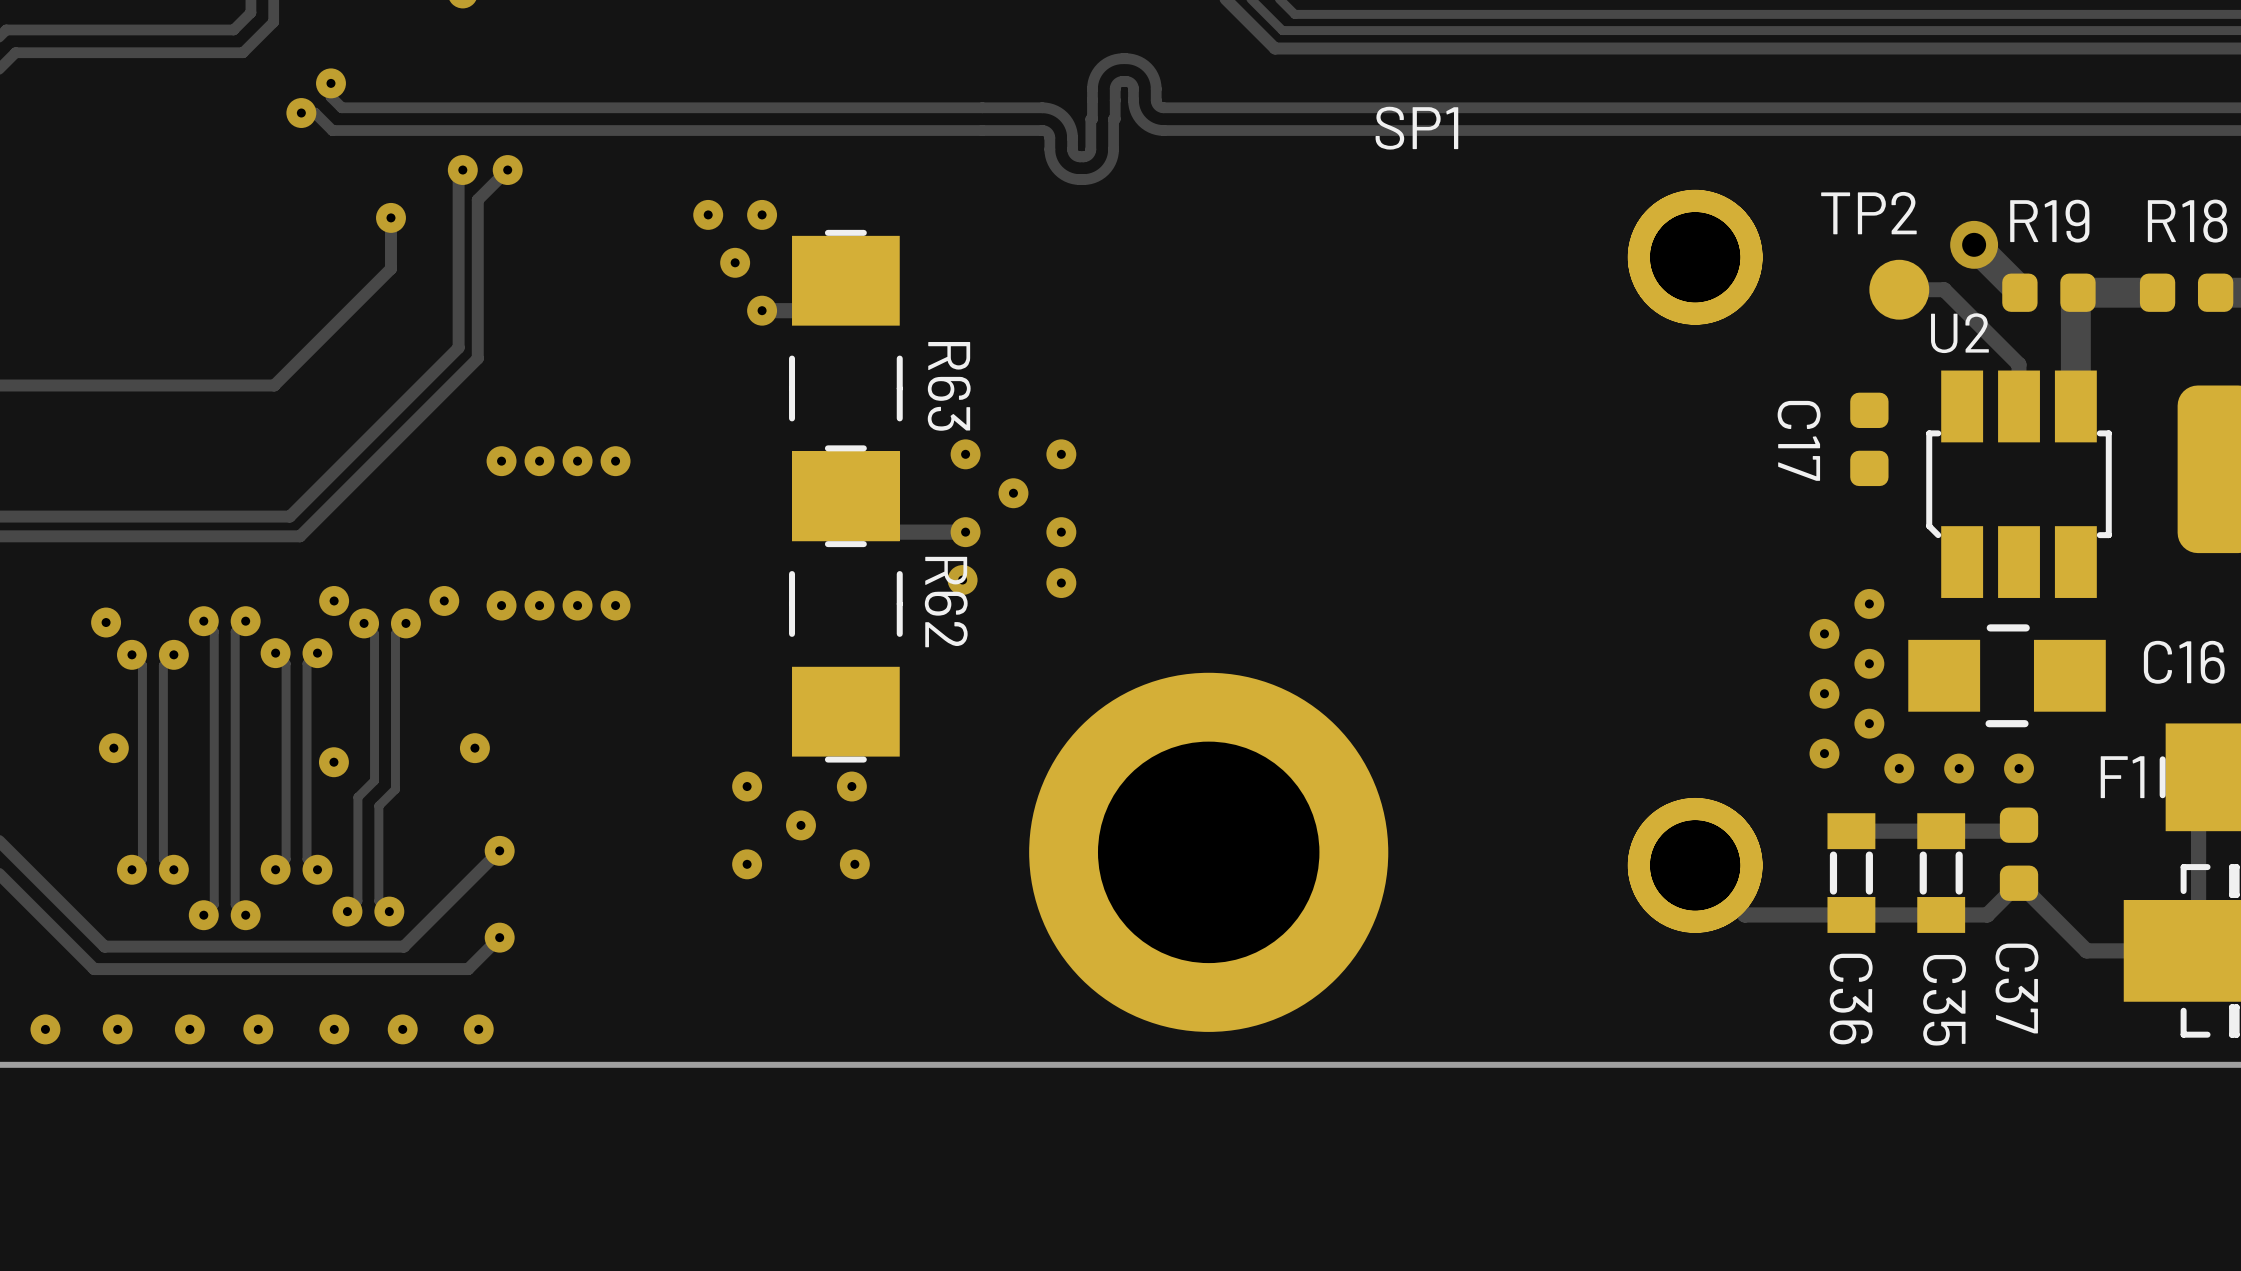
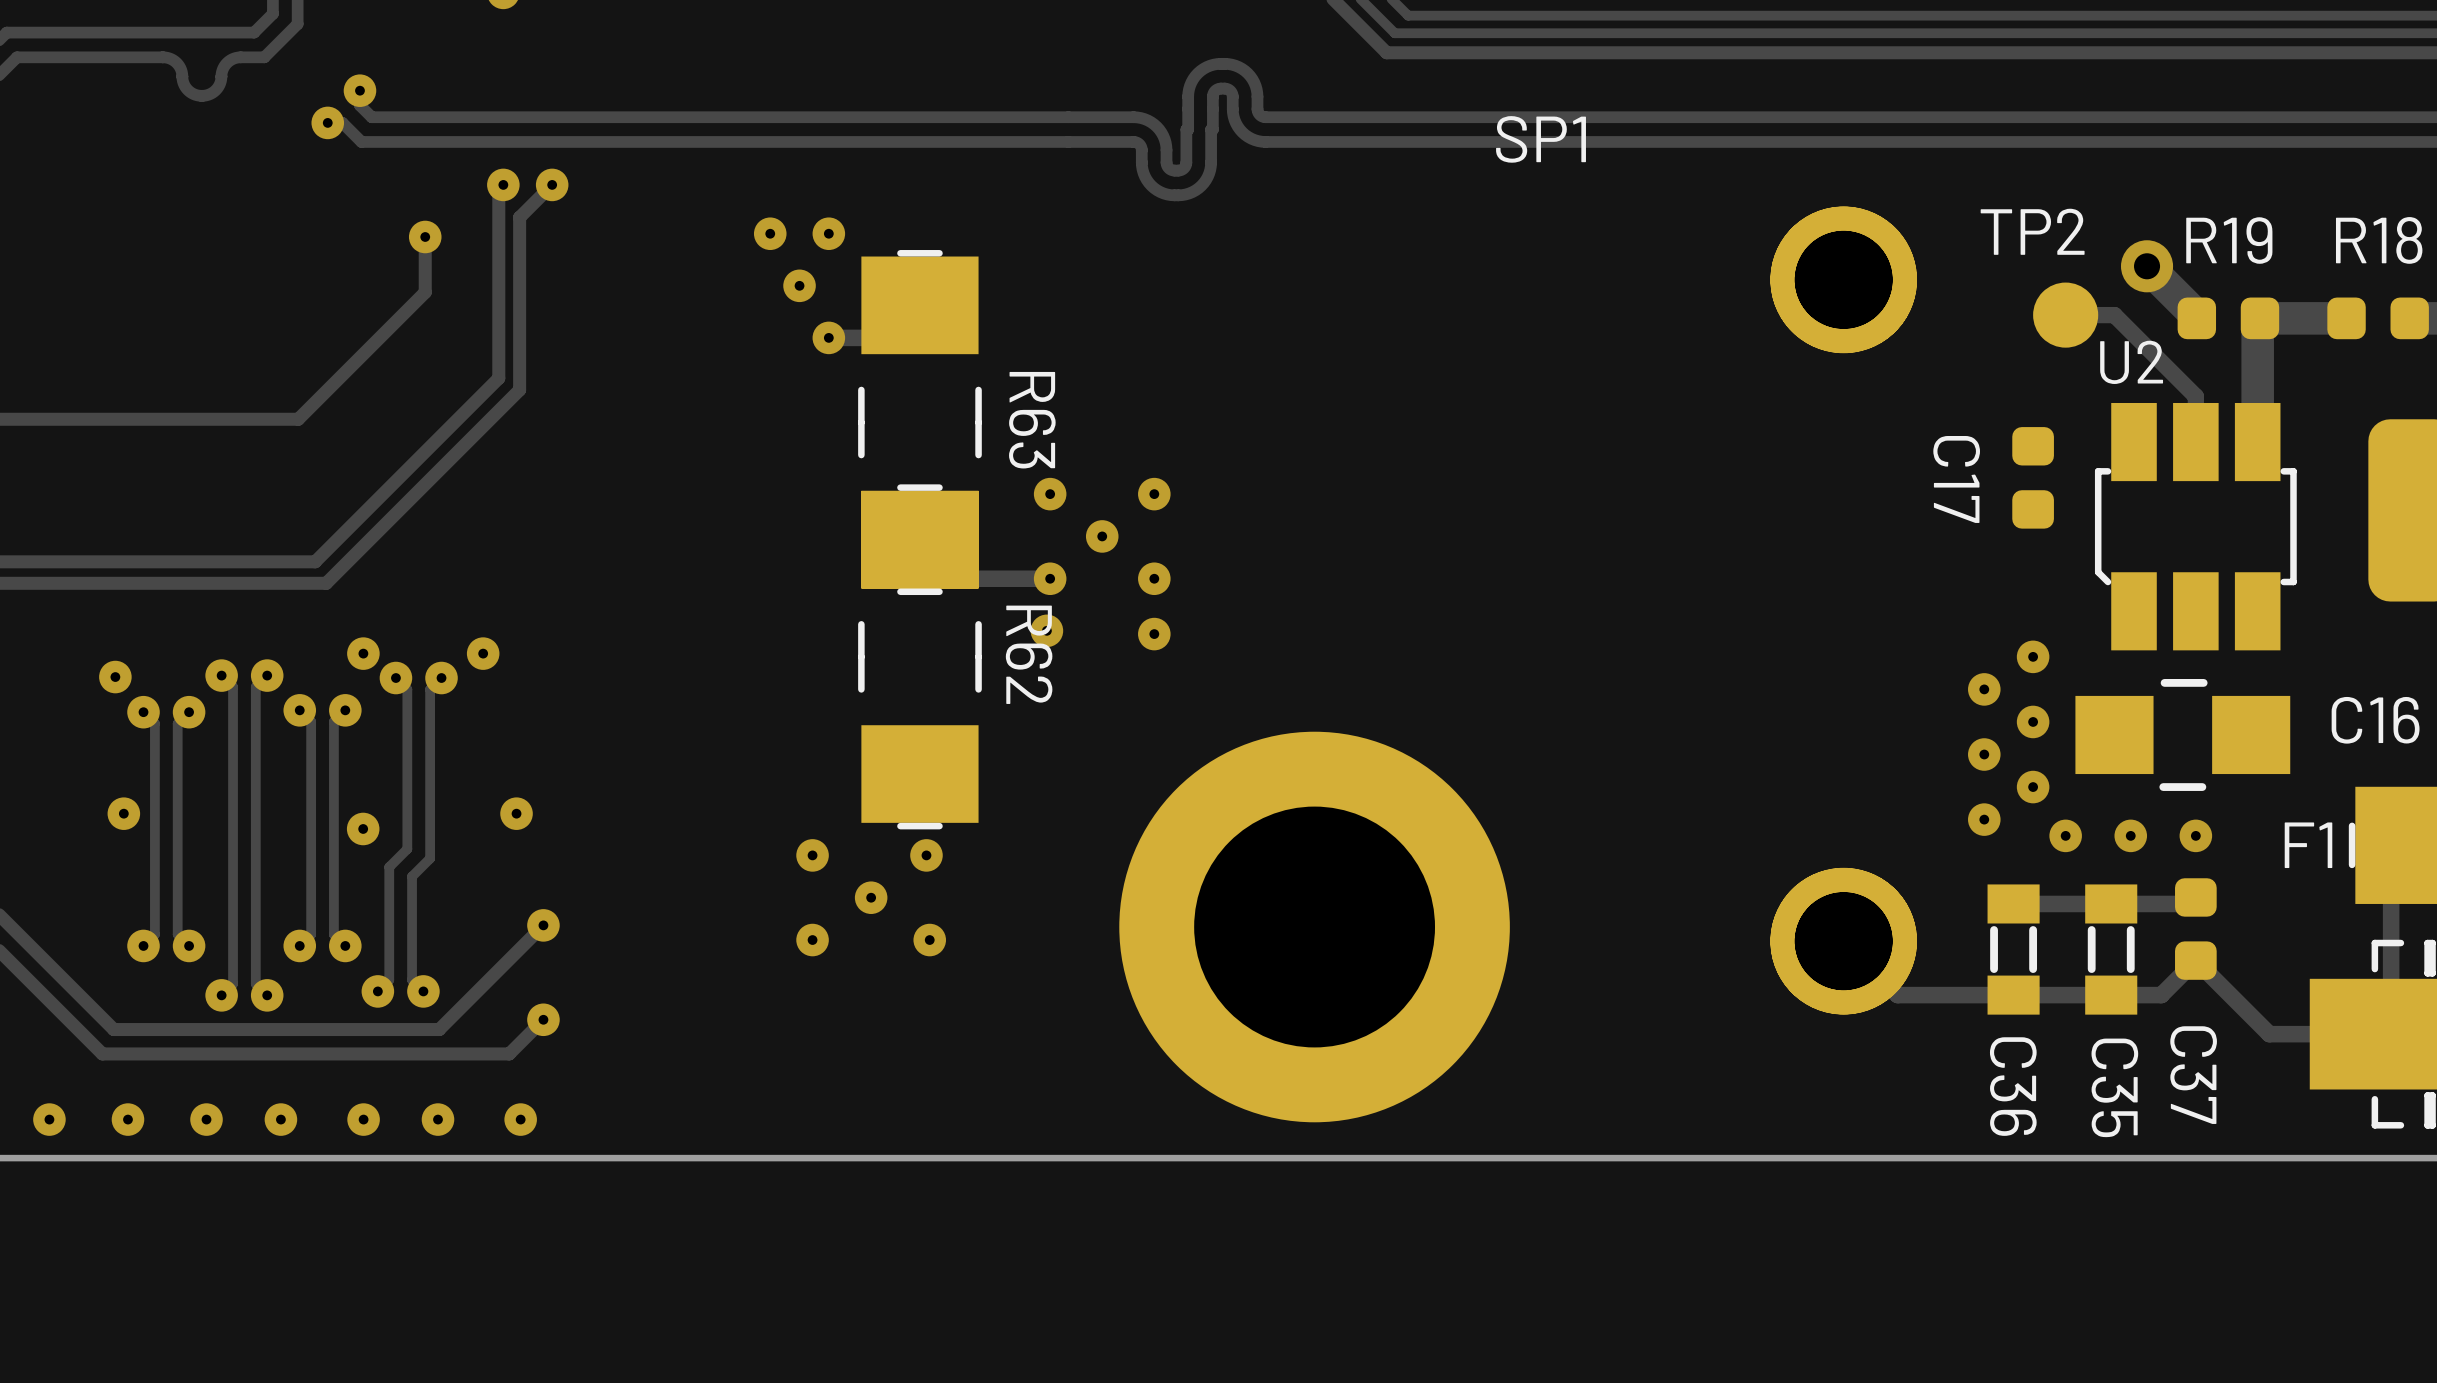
track: none -> (163, 57) (171, 59) (178, 64) (183, 82) (188, 90) (201, 95)
track: (221, 52) (149, 52) -> (240, 57) (232, 59) (225, 64) (220, 82) (215, 90) (202, 95)
via: (501, 461) -> none
via: (539, 461) -> none
via: (577, 461) -> none
via: (615, 461) -> none
via: (501, 605) -> none
via: (539, 605) -> none
via: (577, 605) -> none
via: (615, 605) -> none

